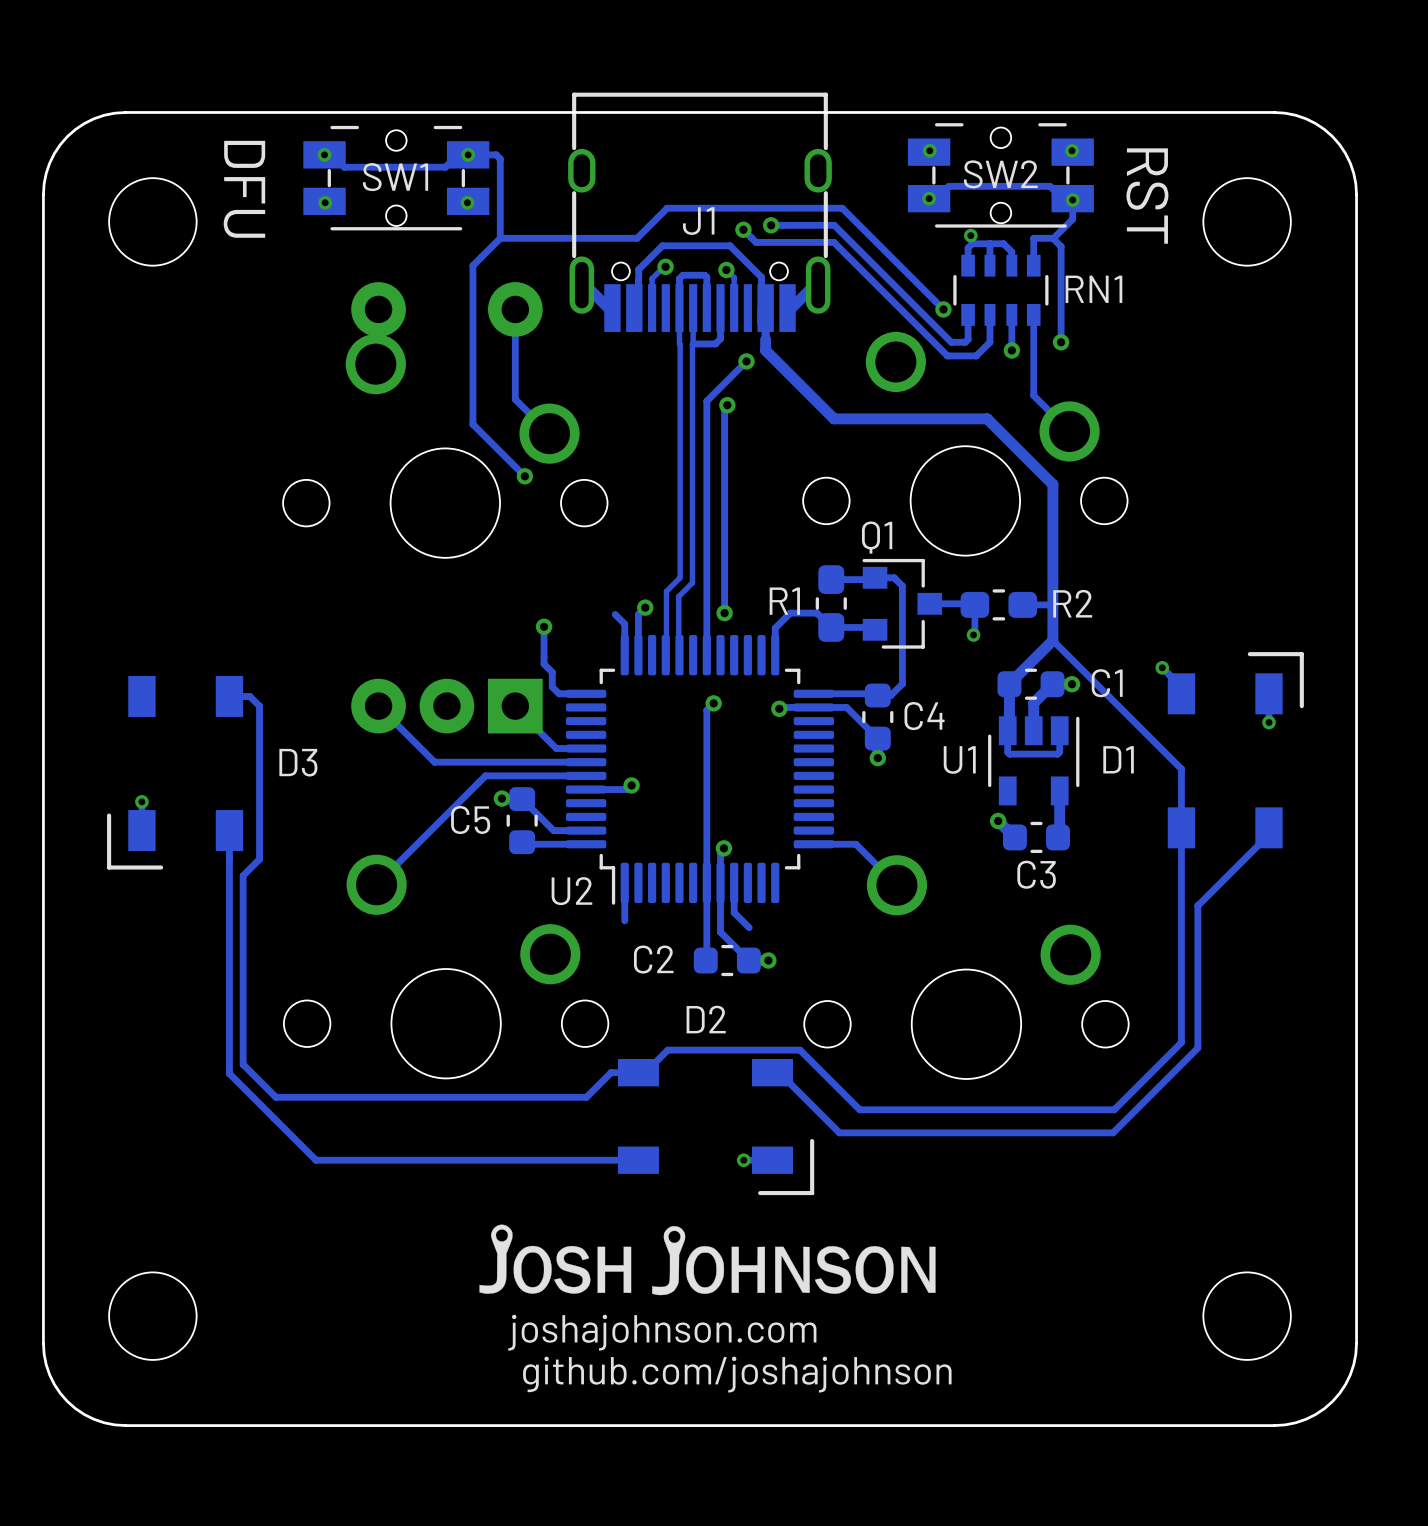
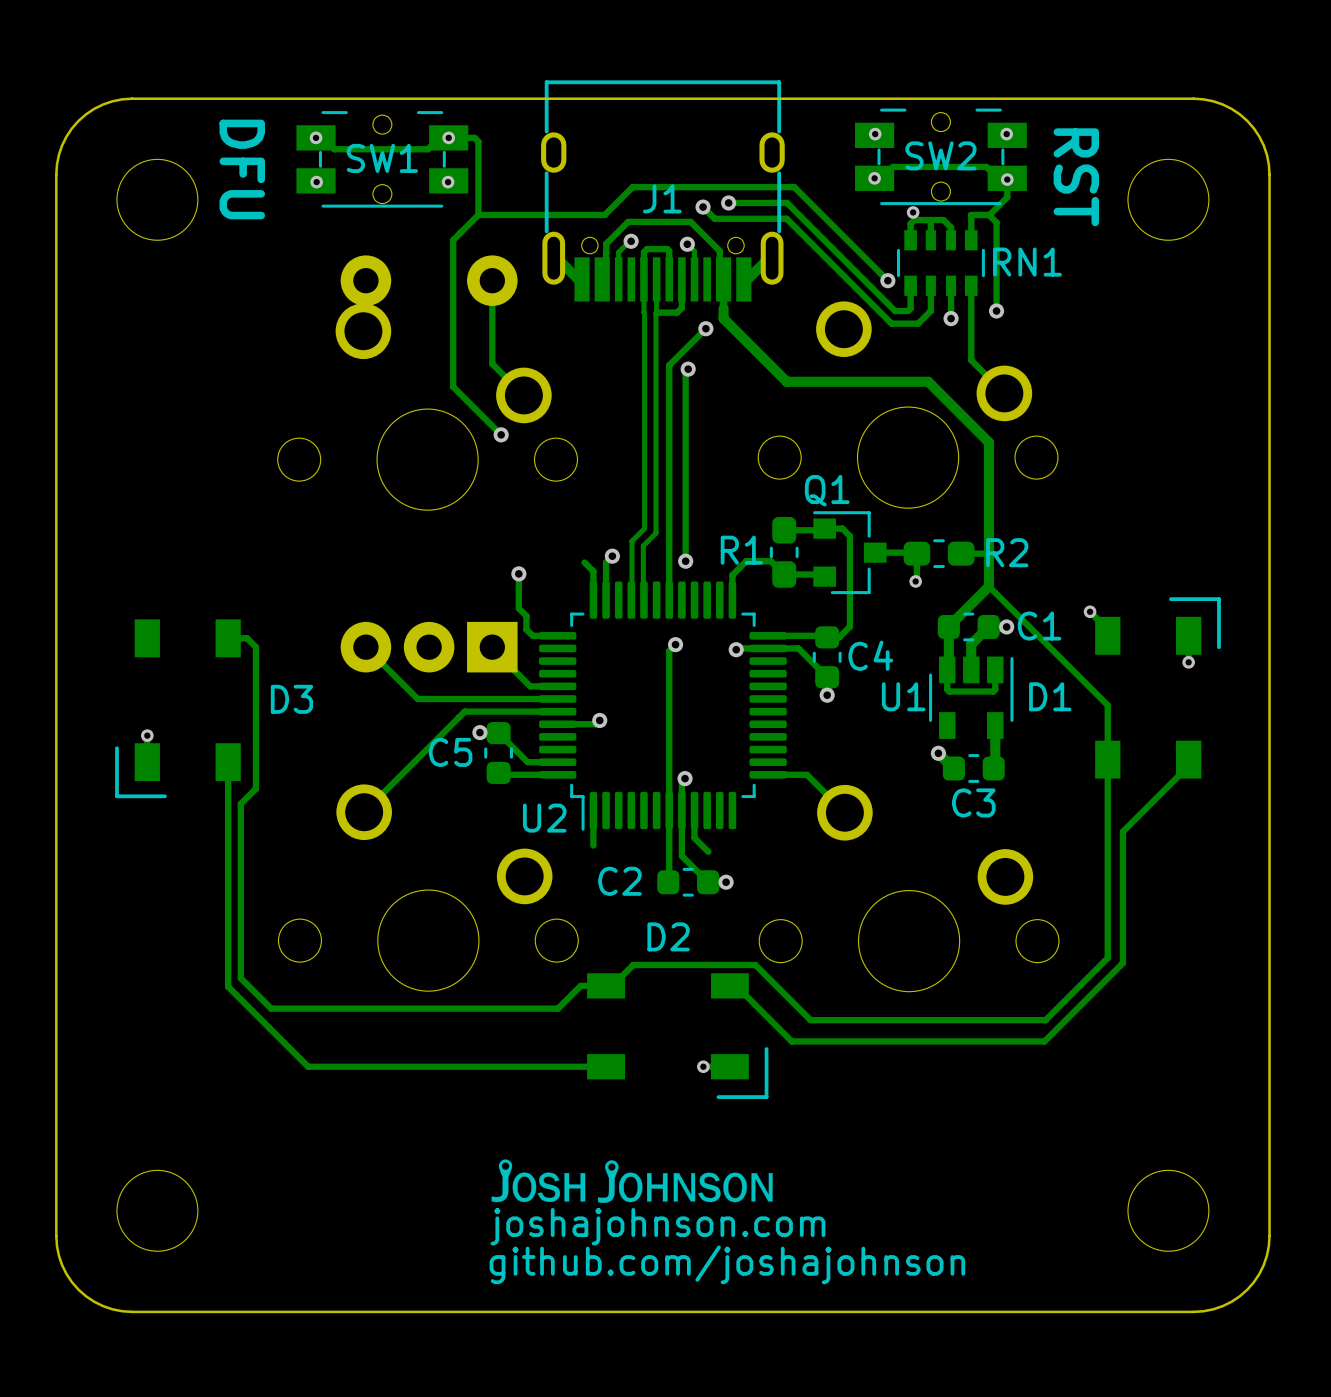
drawing: [479, 1224, 936, 1296] -> none
drawing: none -> [491, 1159, 773, 1203]
drawing position: (729, 1353) -> (727, 1246)

